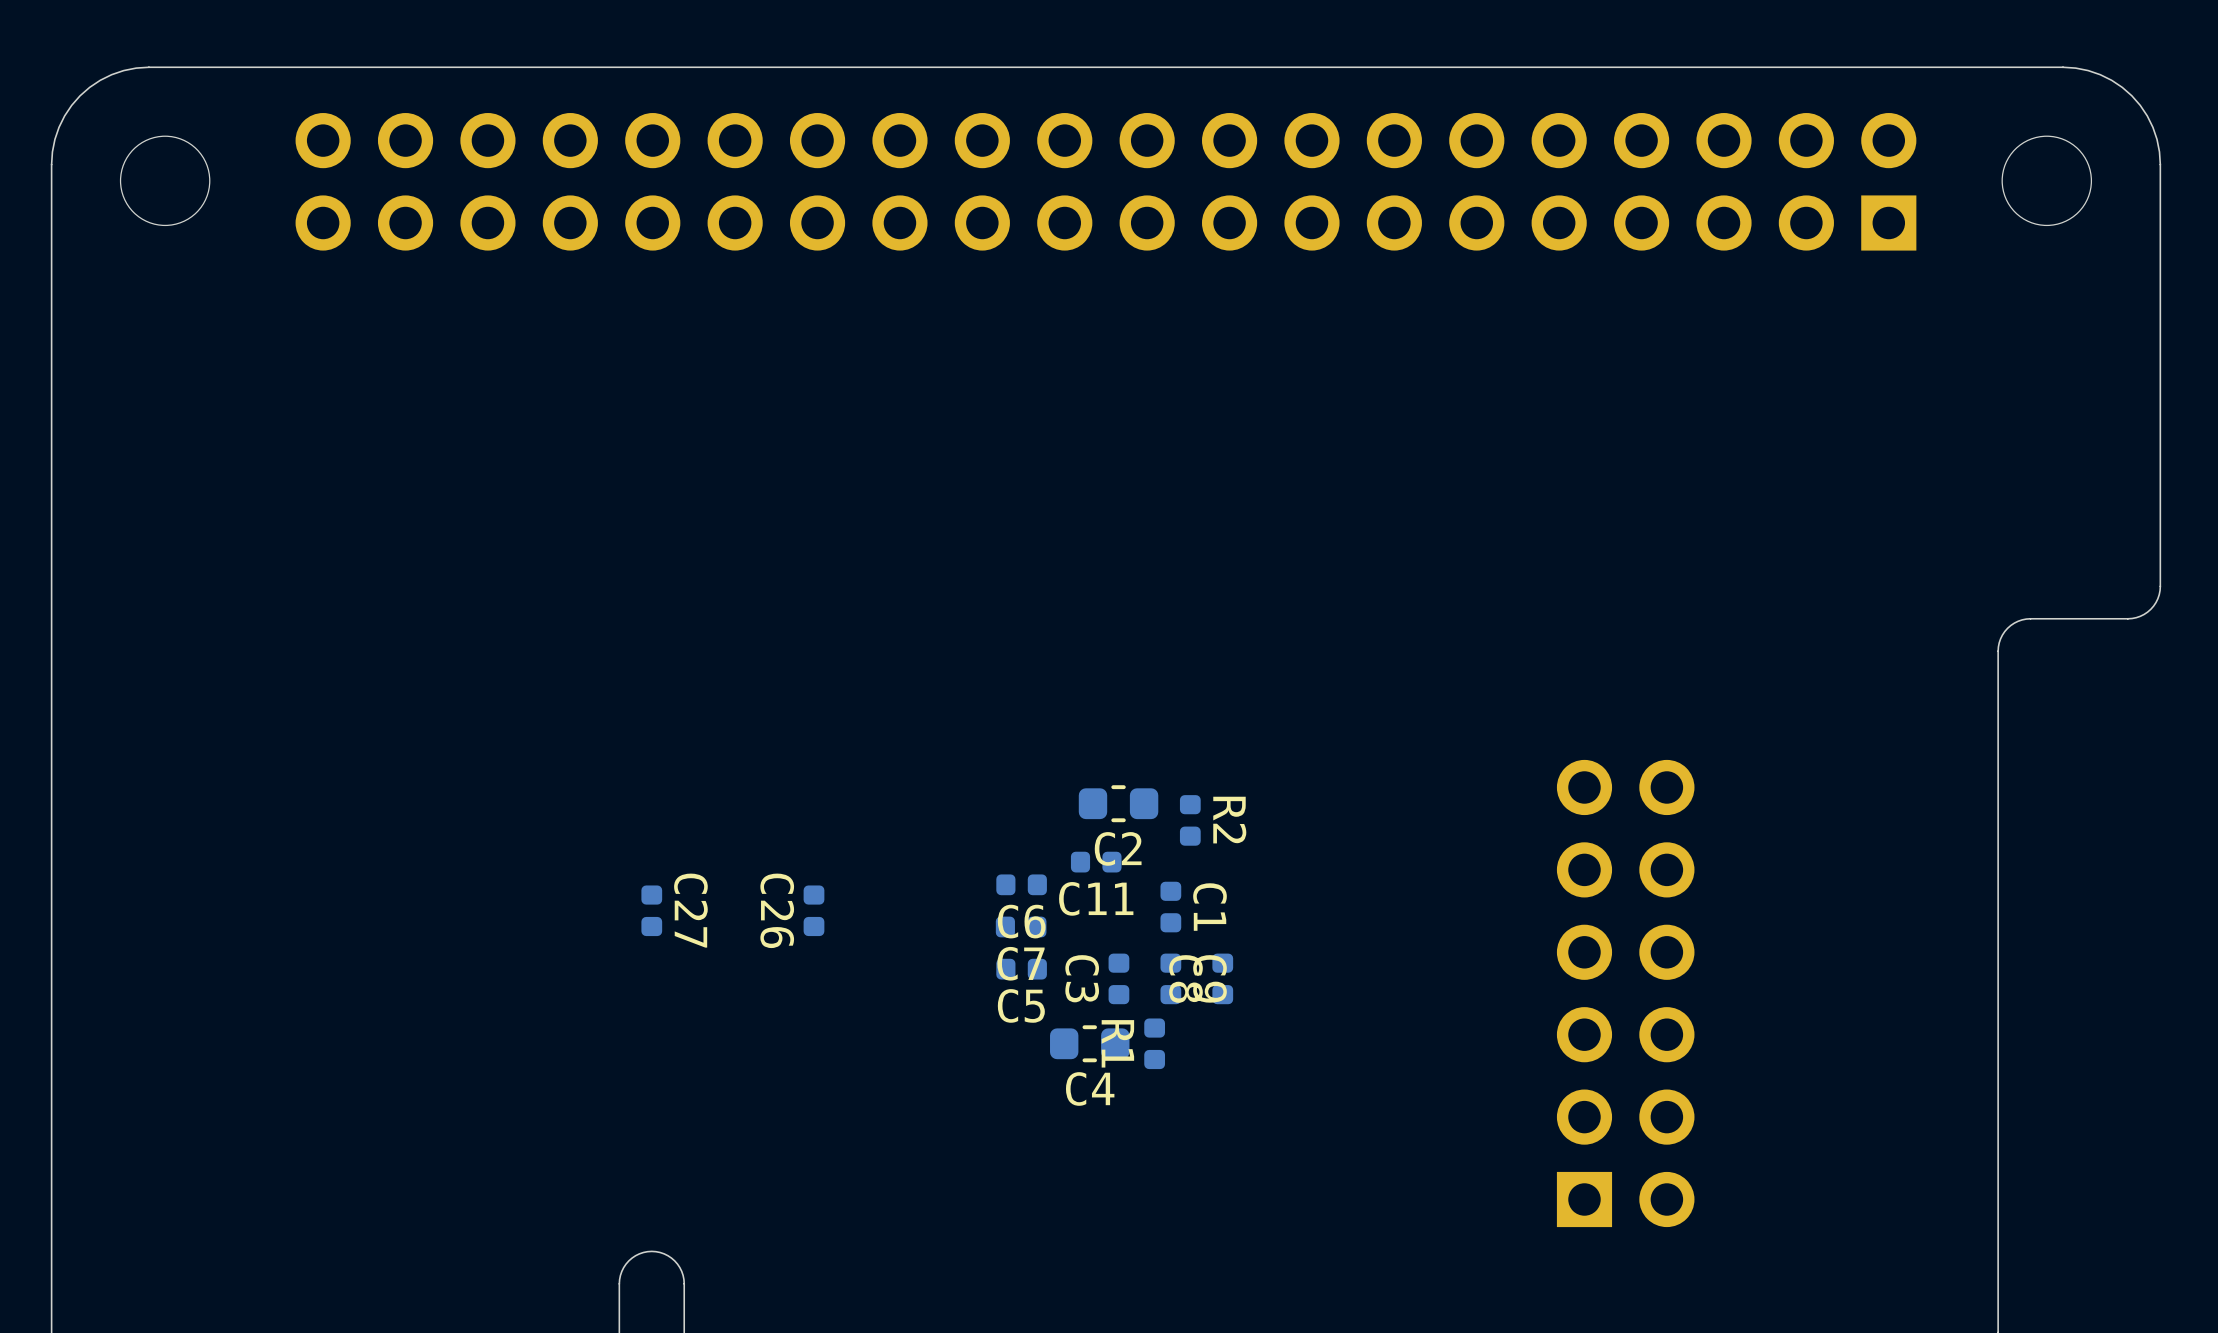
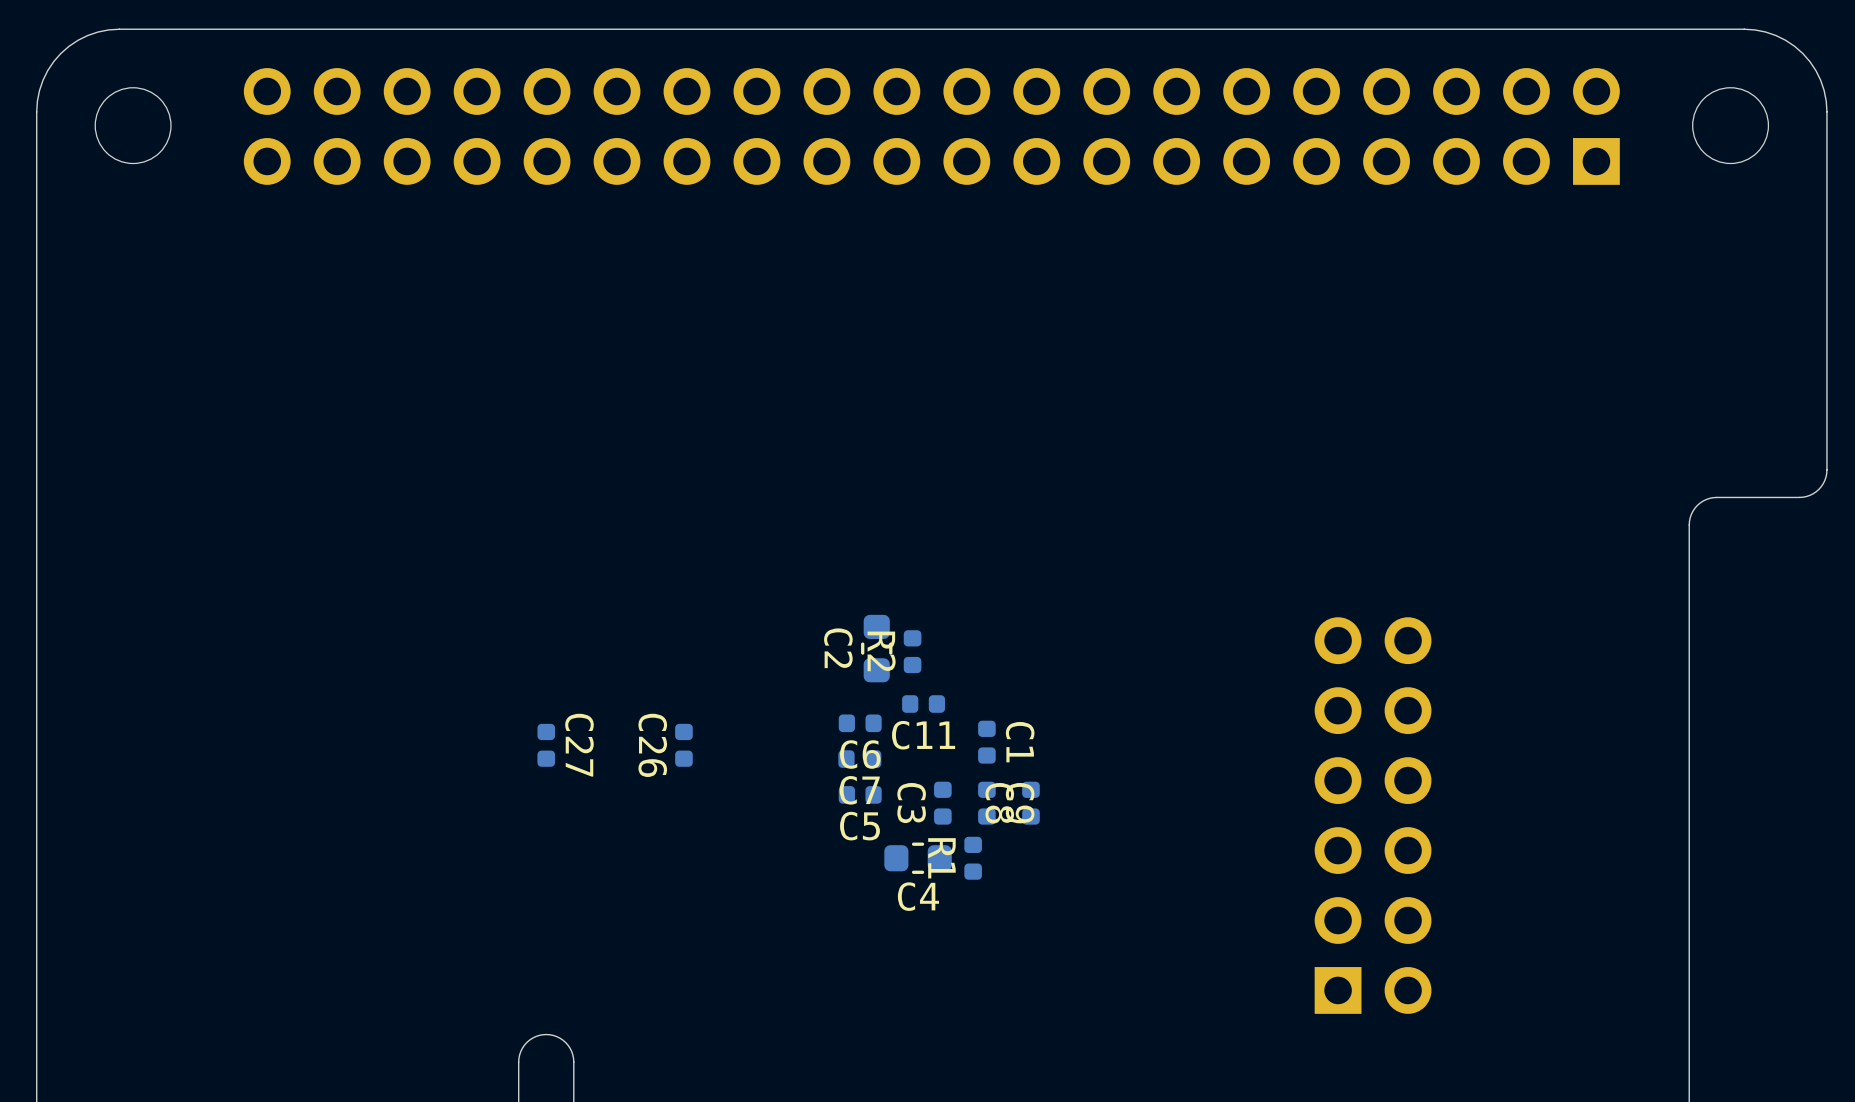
C2 rotation: 0° (1118, 803) -> 90° clockwise (876, 648)
C2 position: (1118, 803) -> (876, 648)
R2 position: (1190, 820) -> (912, 651)
R2 name position: R2 (1229, 820) -> R2 (881, 651)

